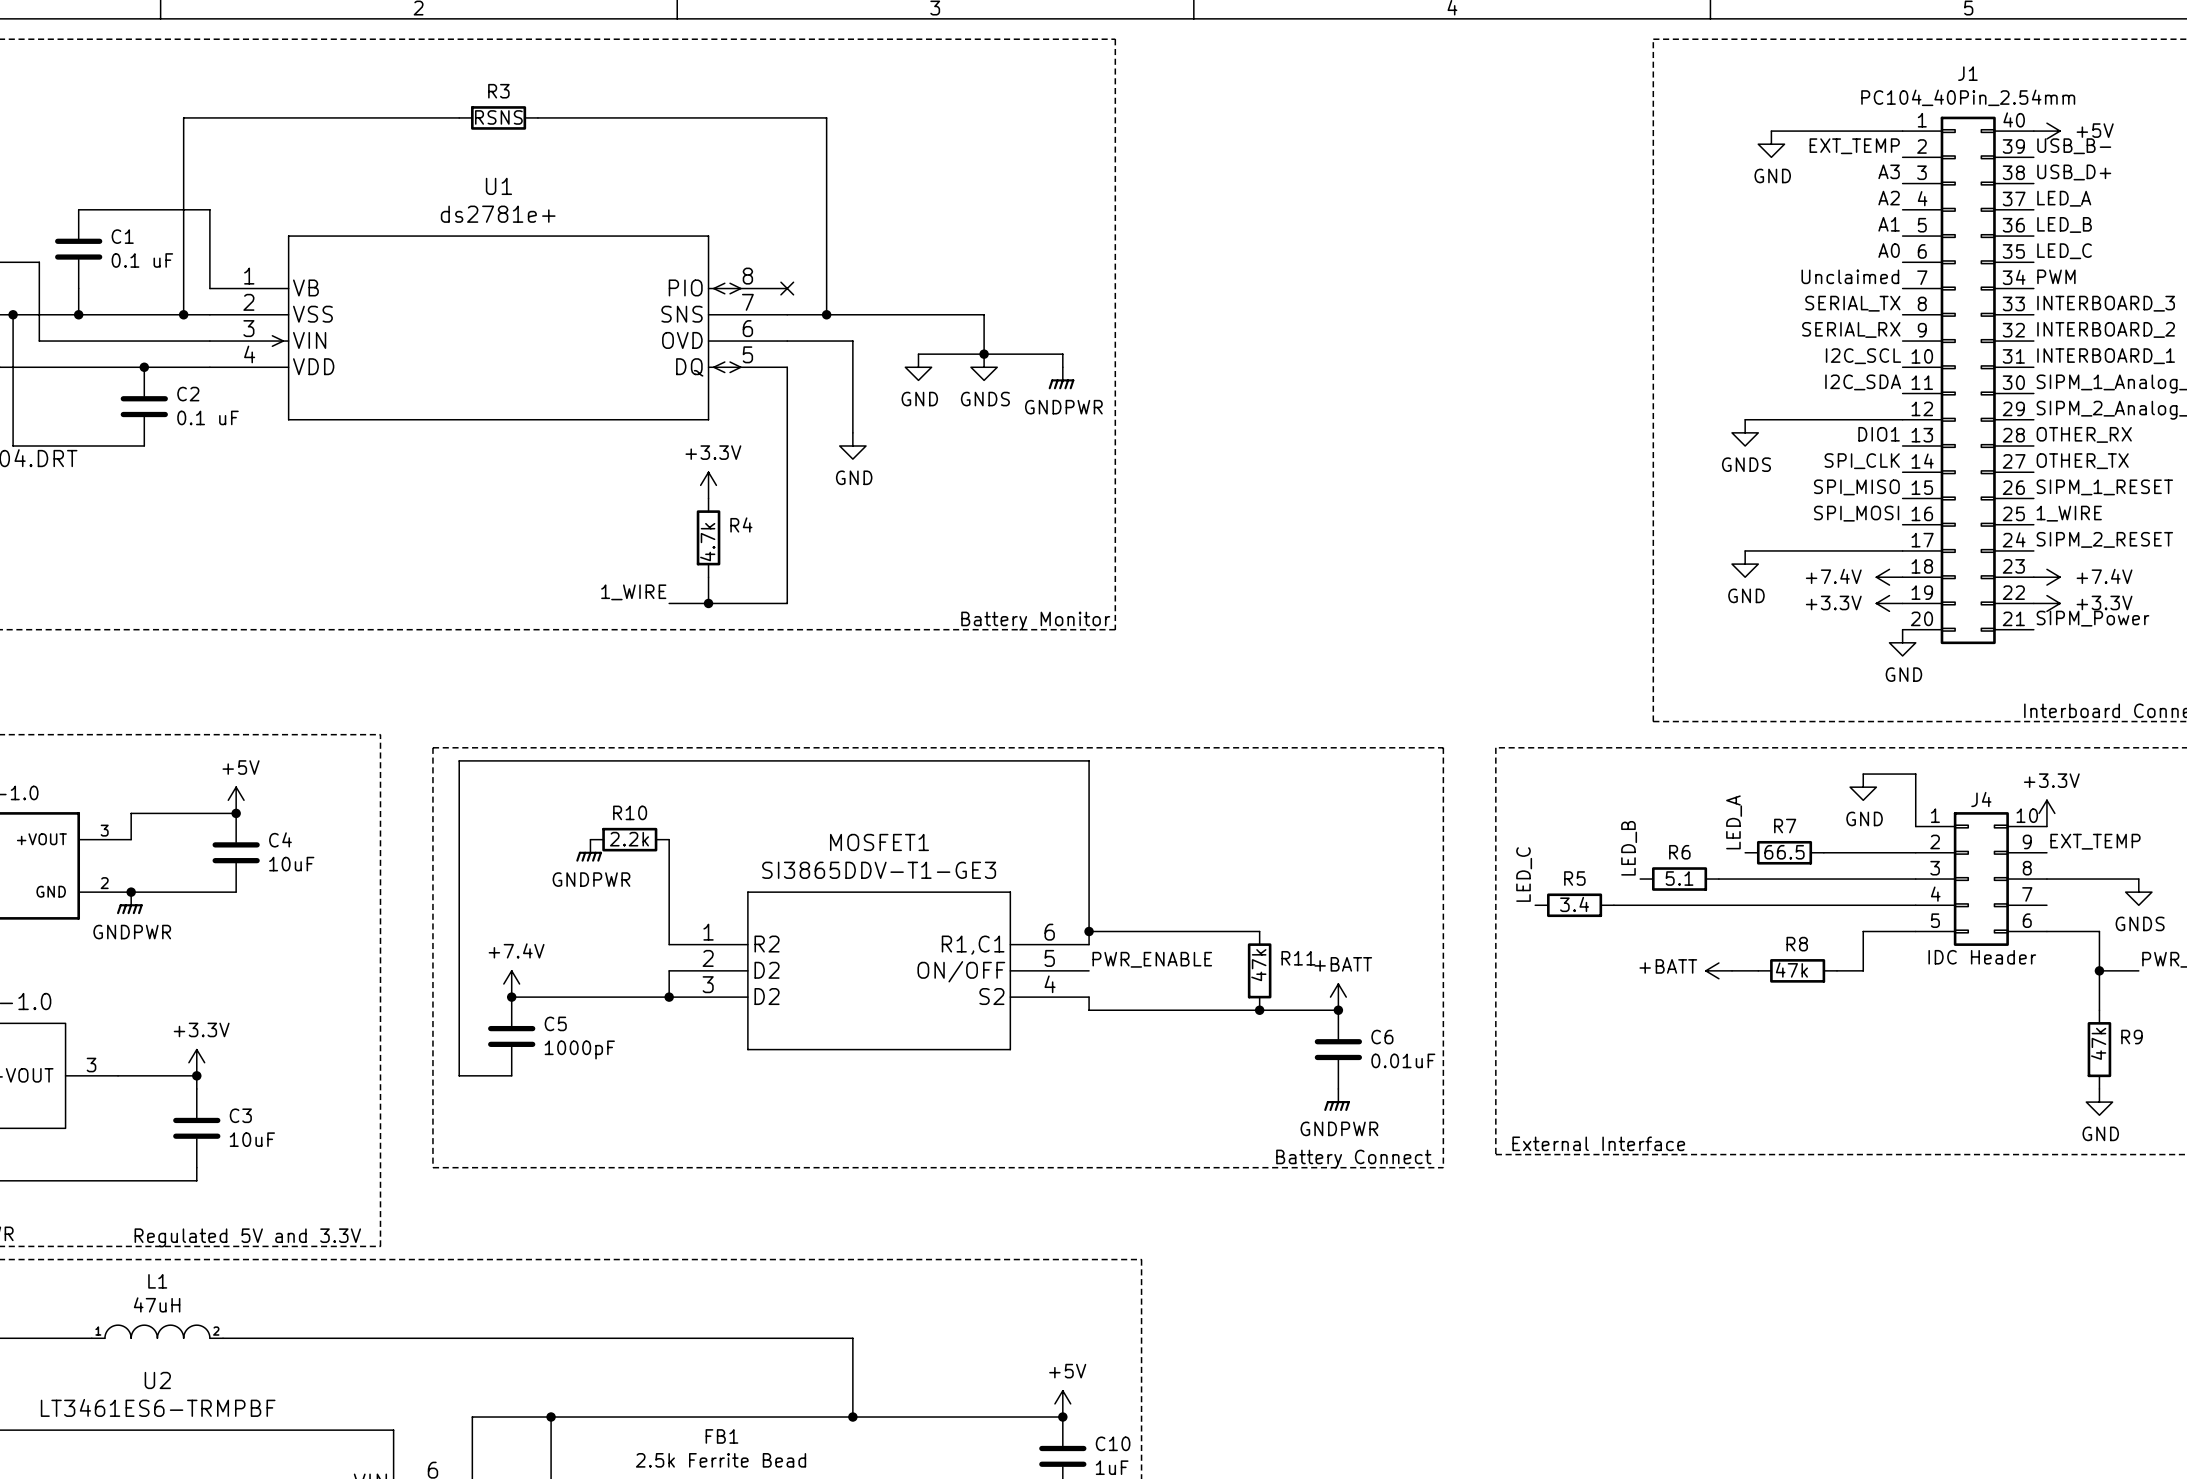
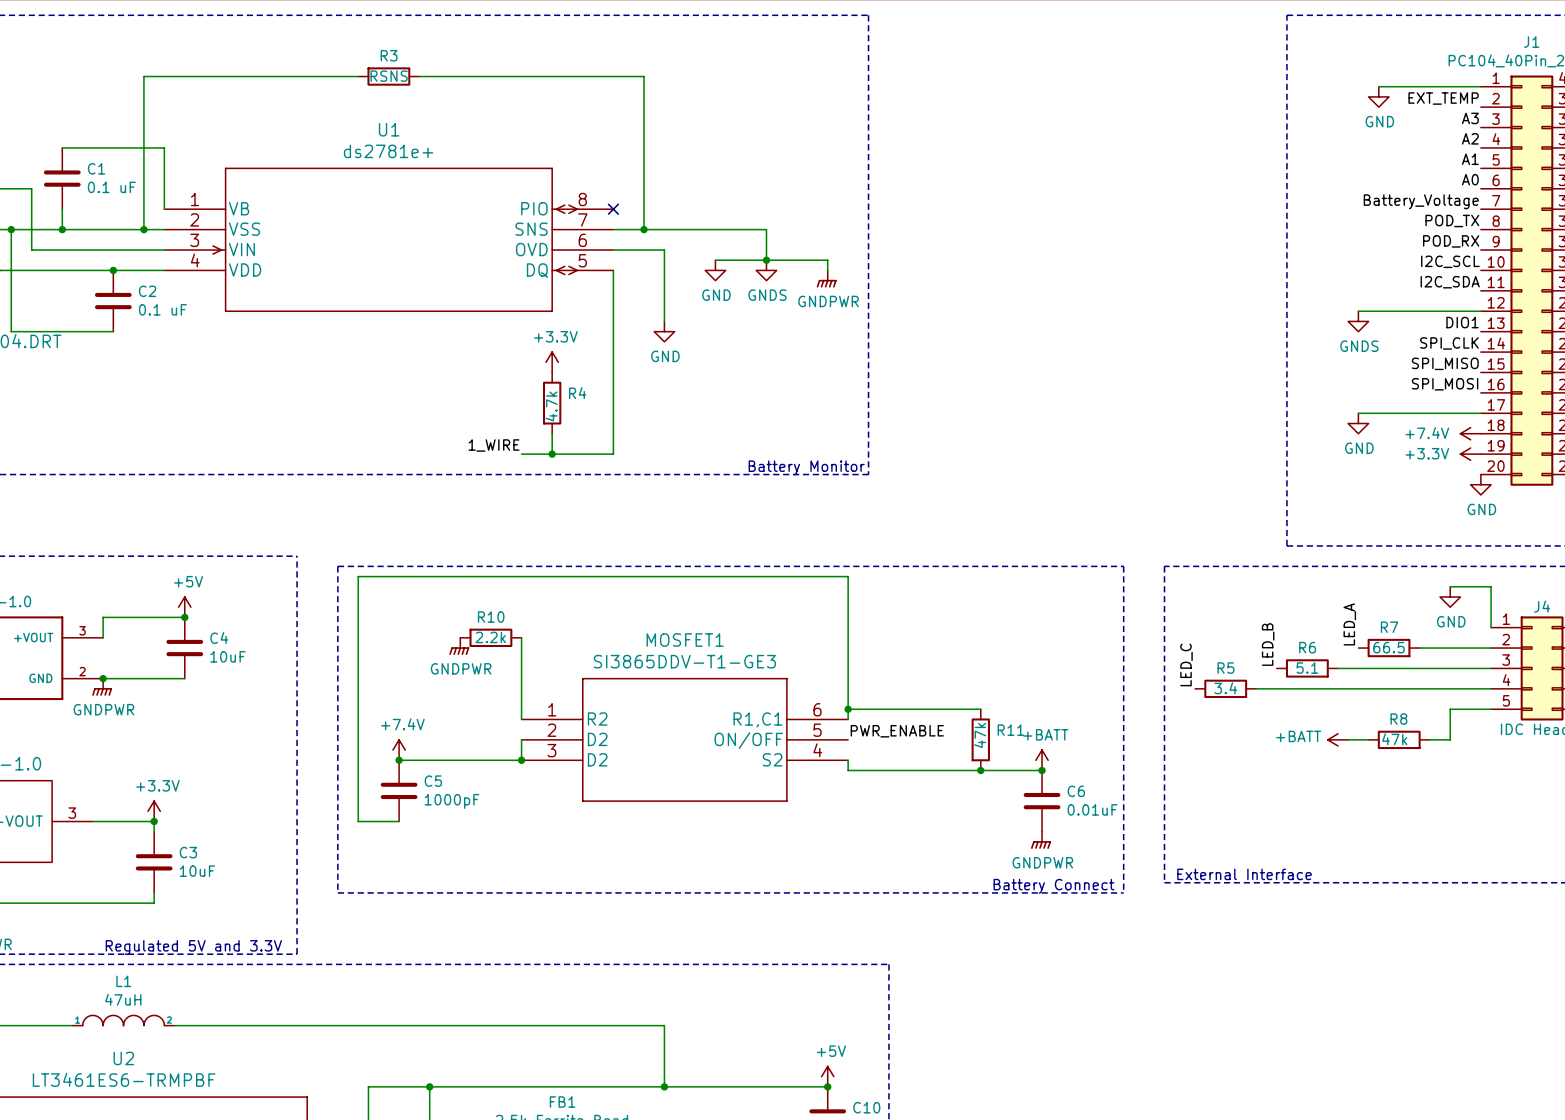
label: Unclaimed (1850, 276) -> Battery_Voltage (1421, 201)
label: SERIAL_TX (1852, 303) -> POD_TX (1452, 220)
label: SERIAL_RX (1851, 329) -> POD_RX (1451, 241)

